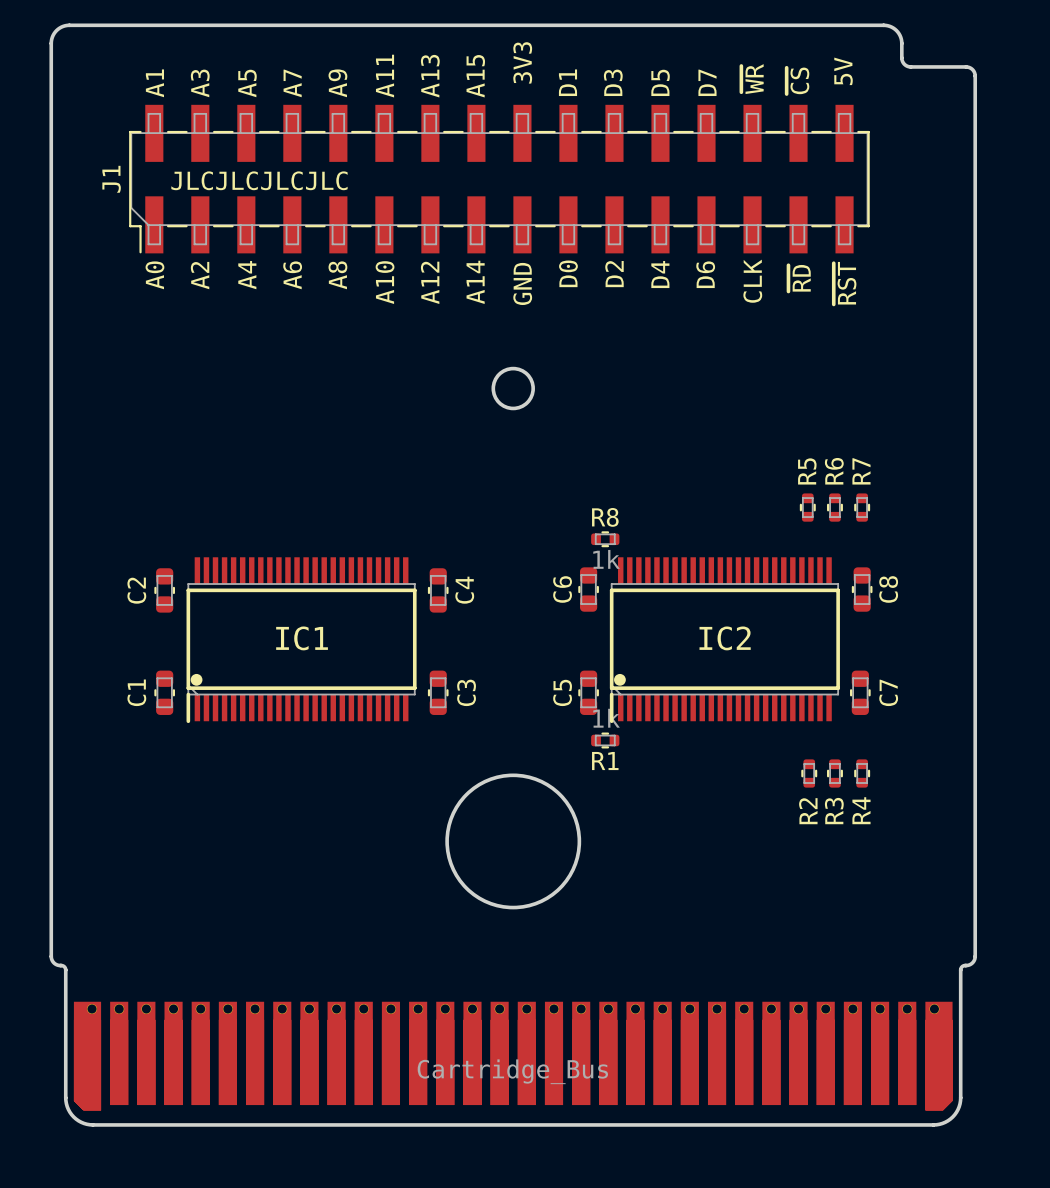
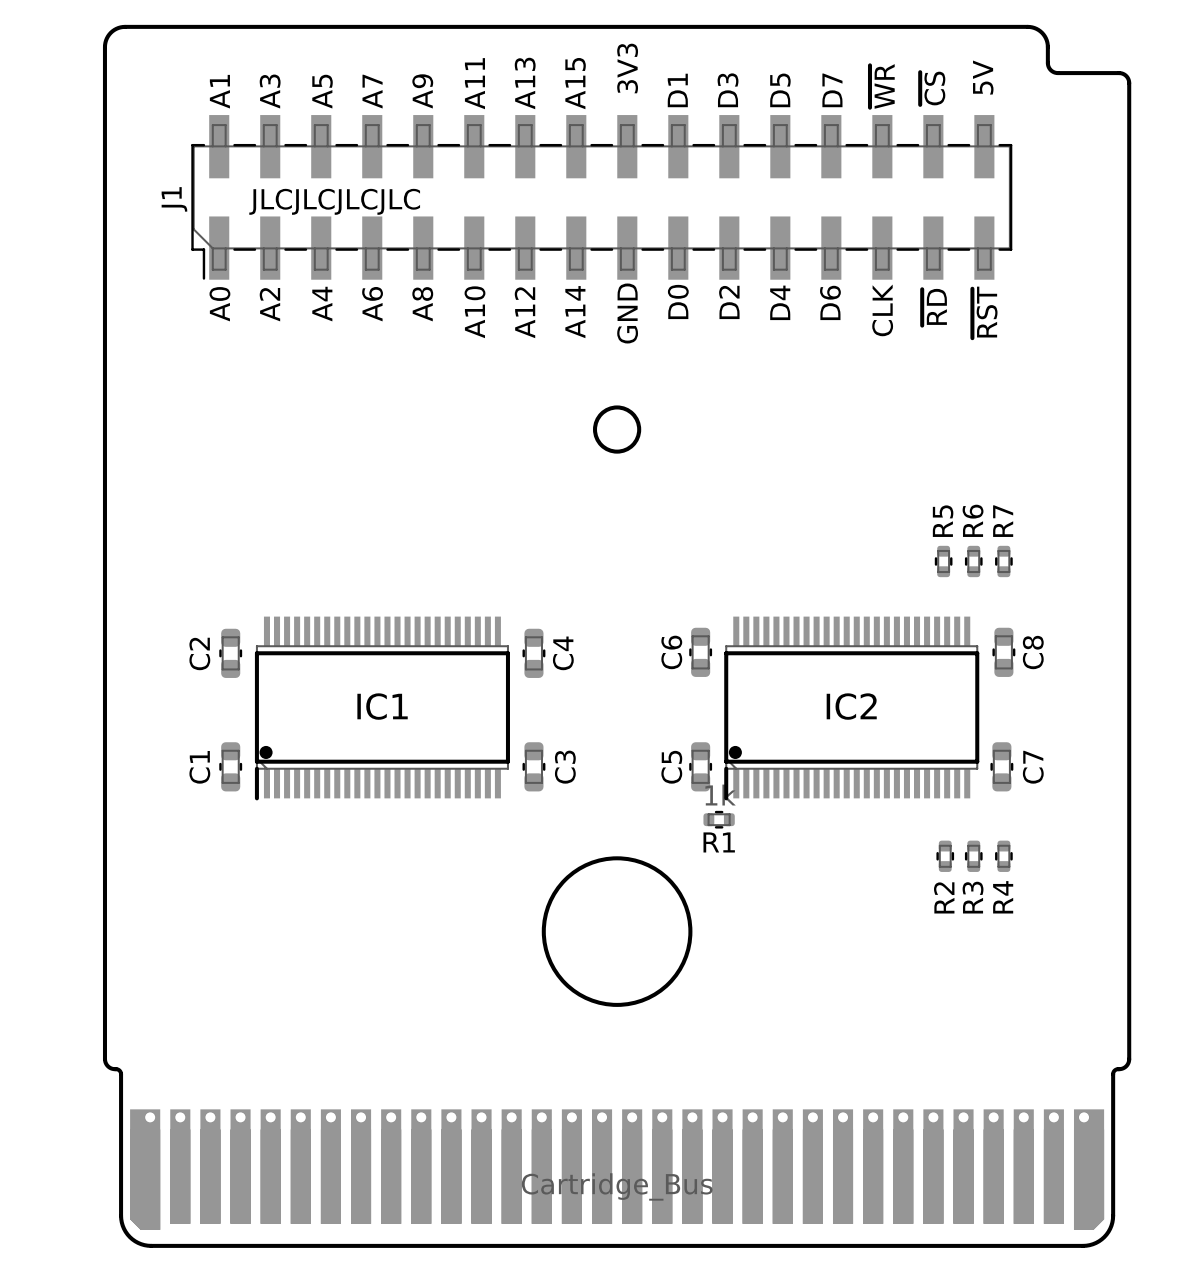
R8: 1k (605, 539) -> none

